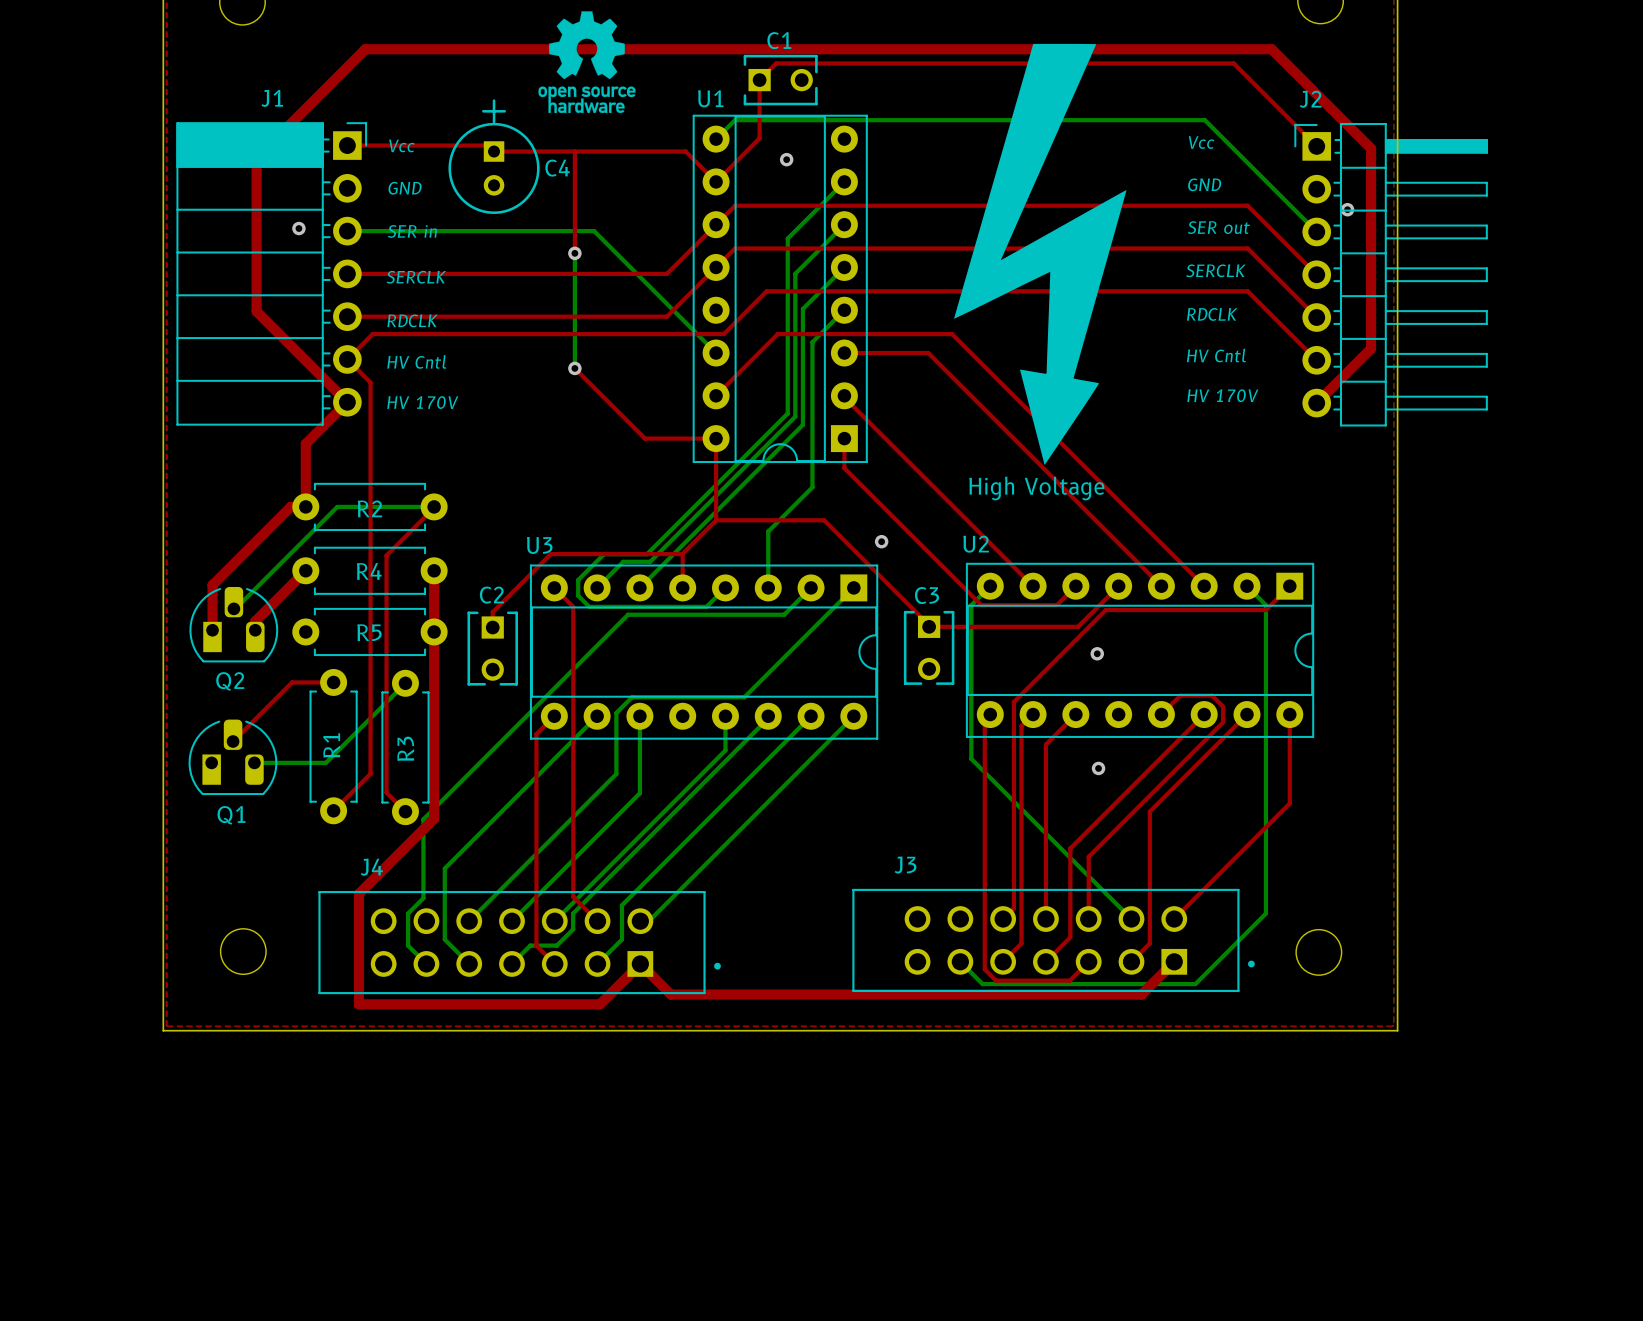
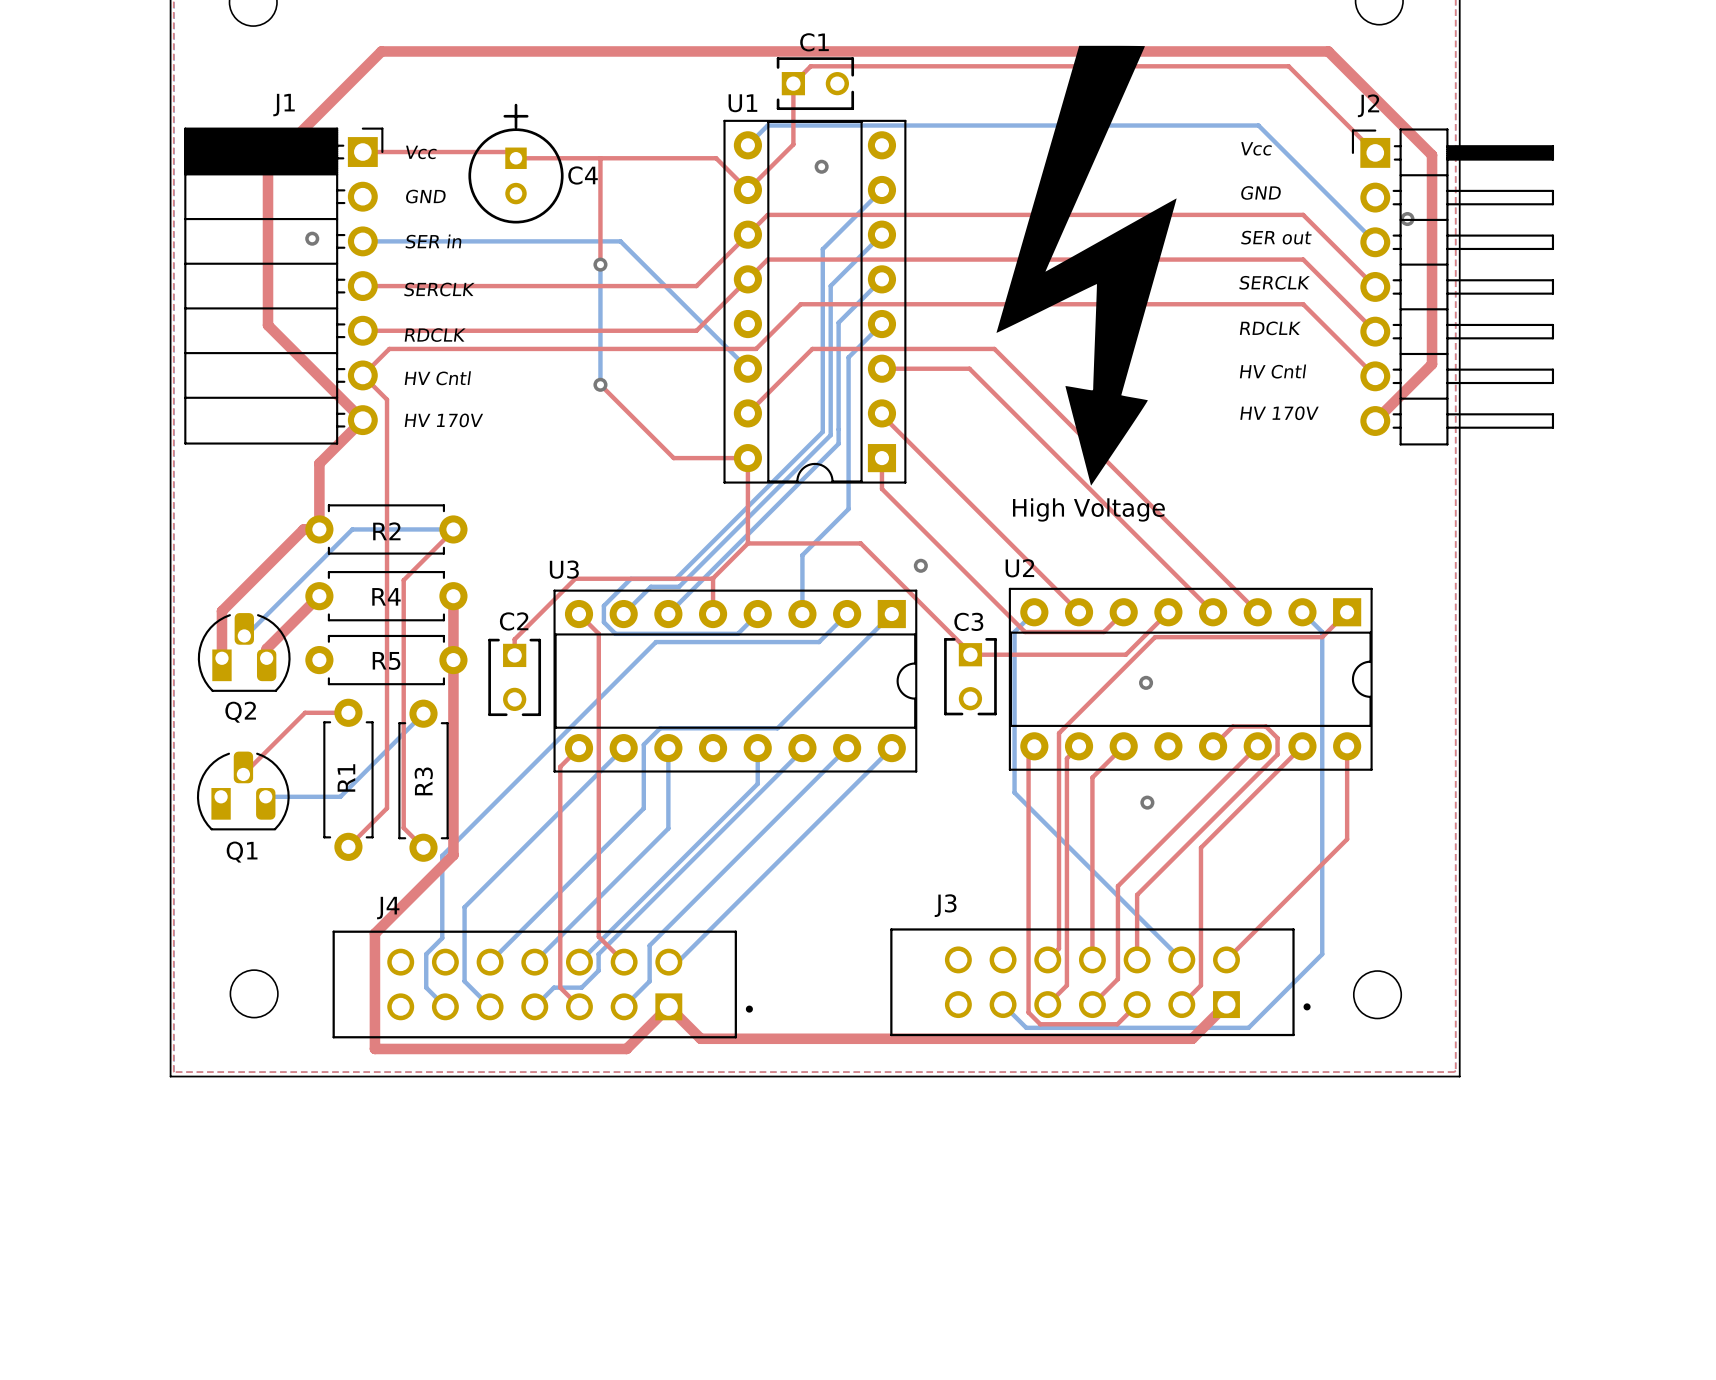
drawing: [538, 11, 636, 114] -> none

